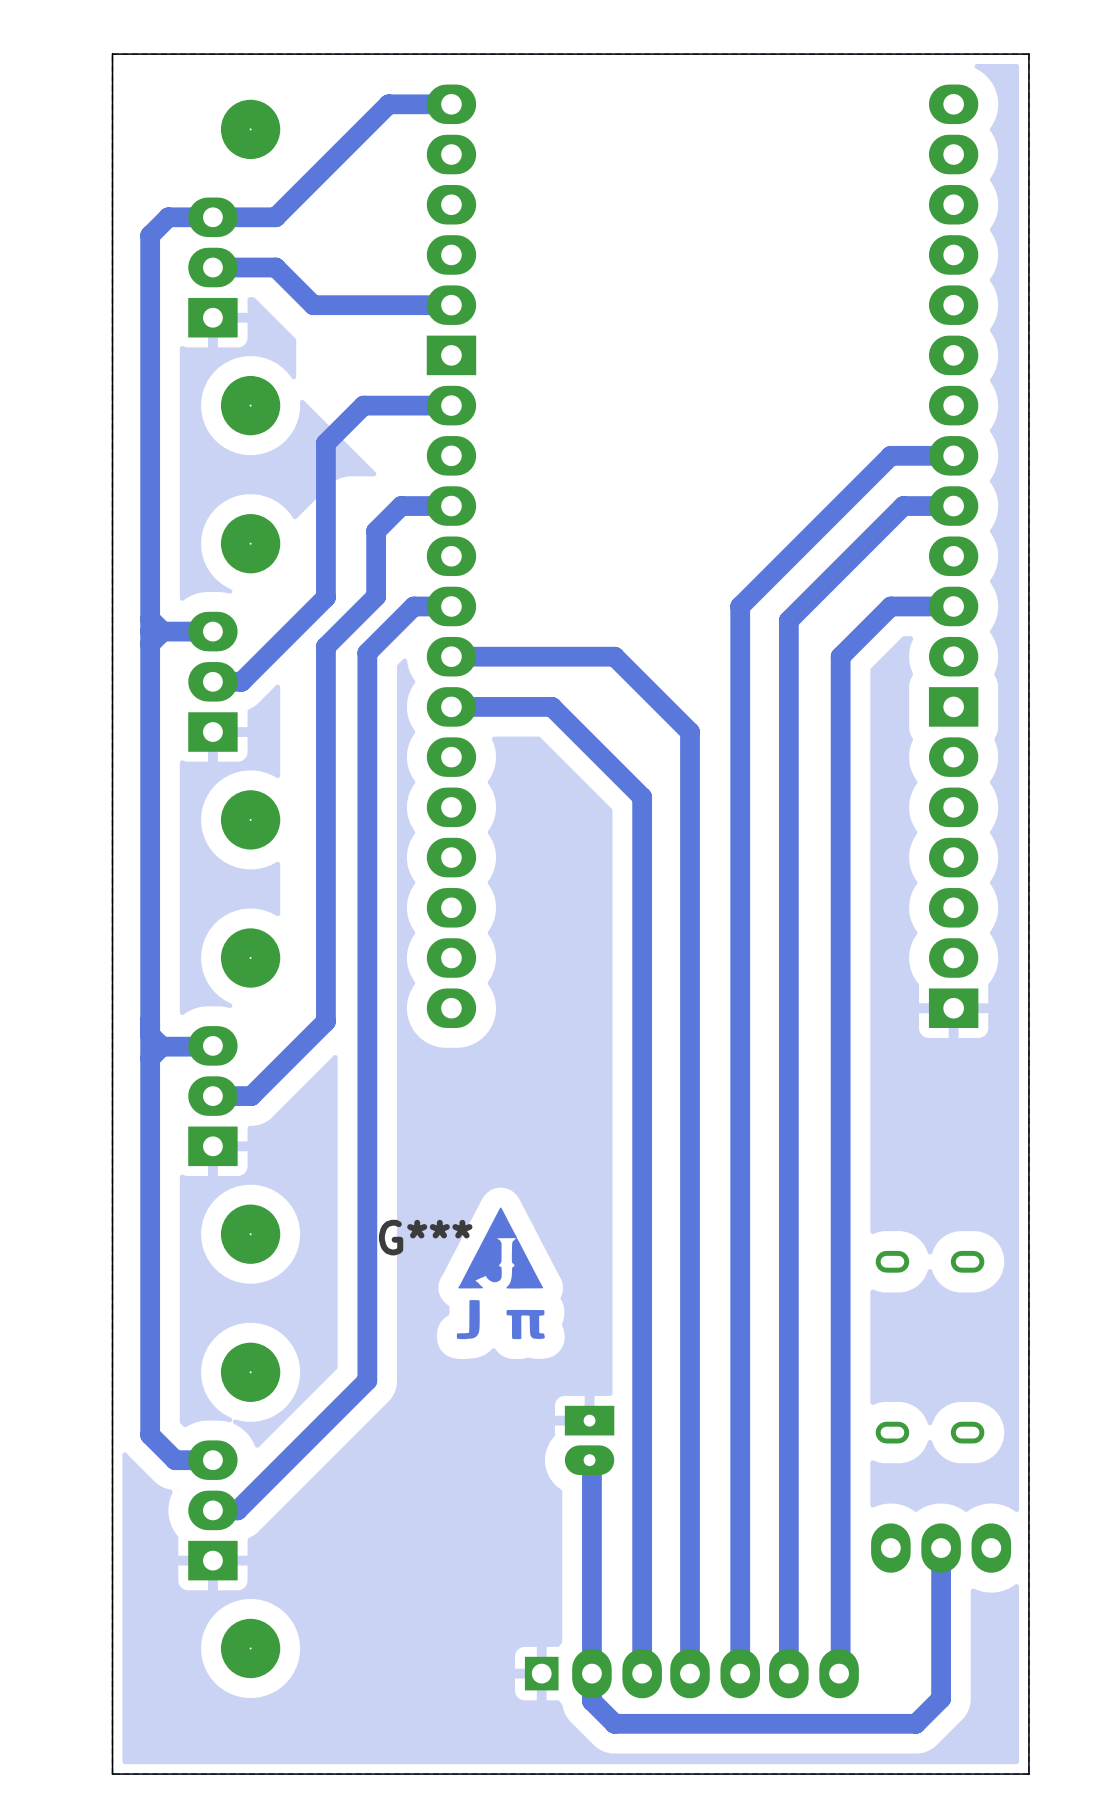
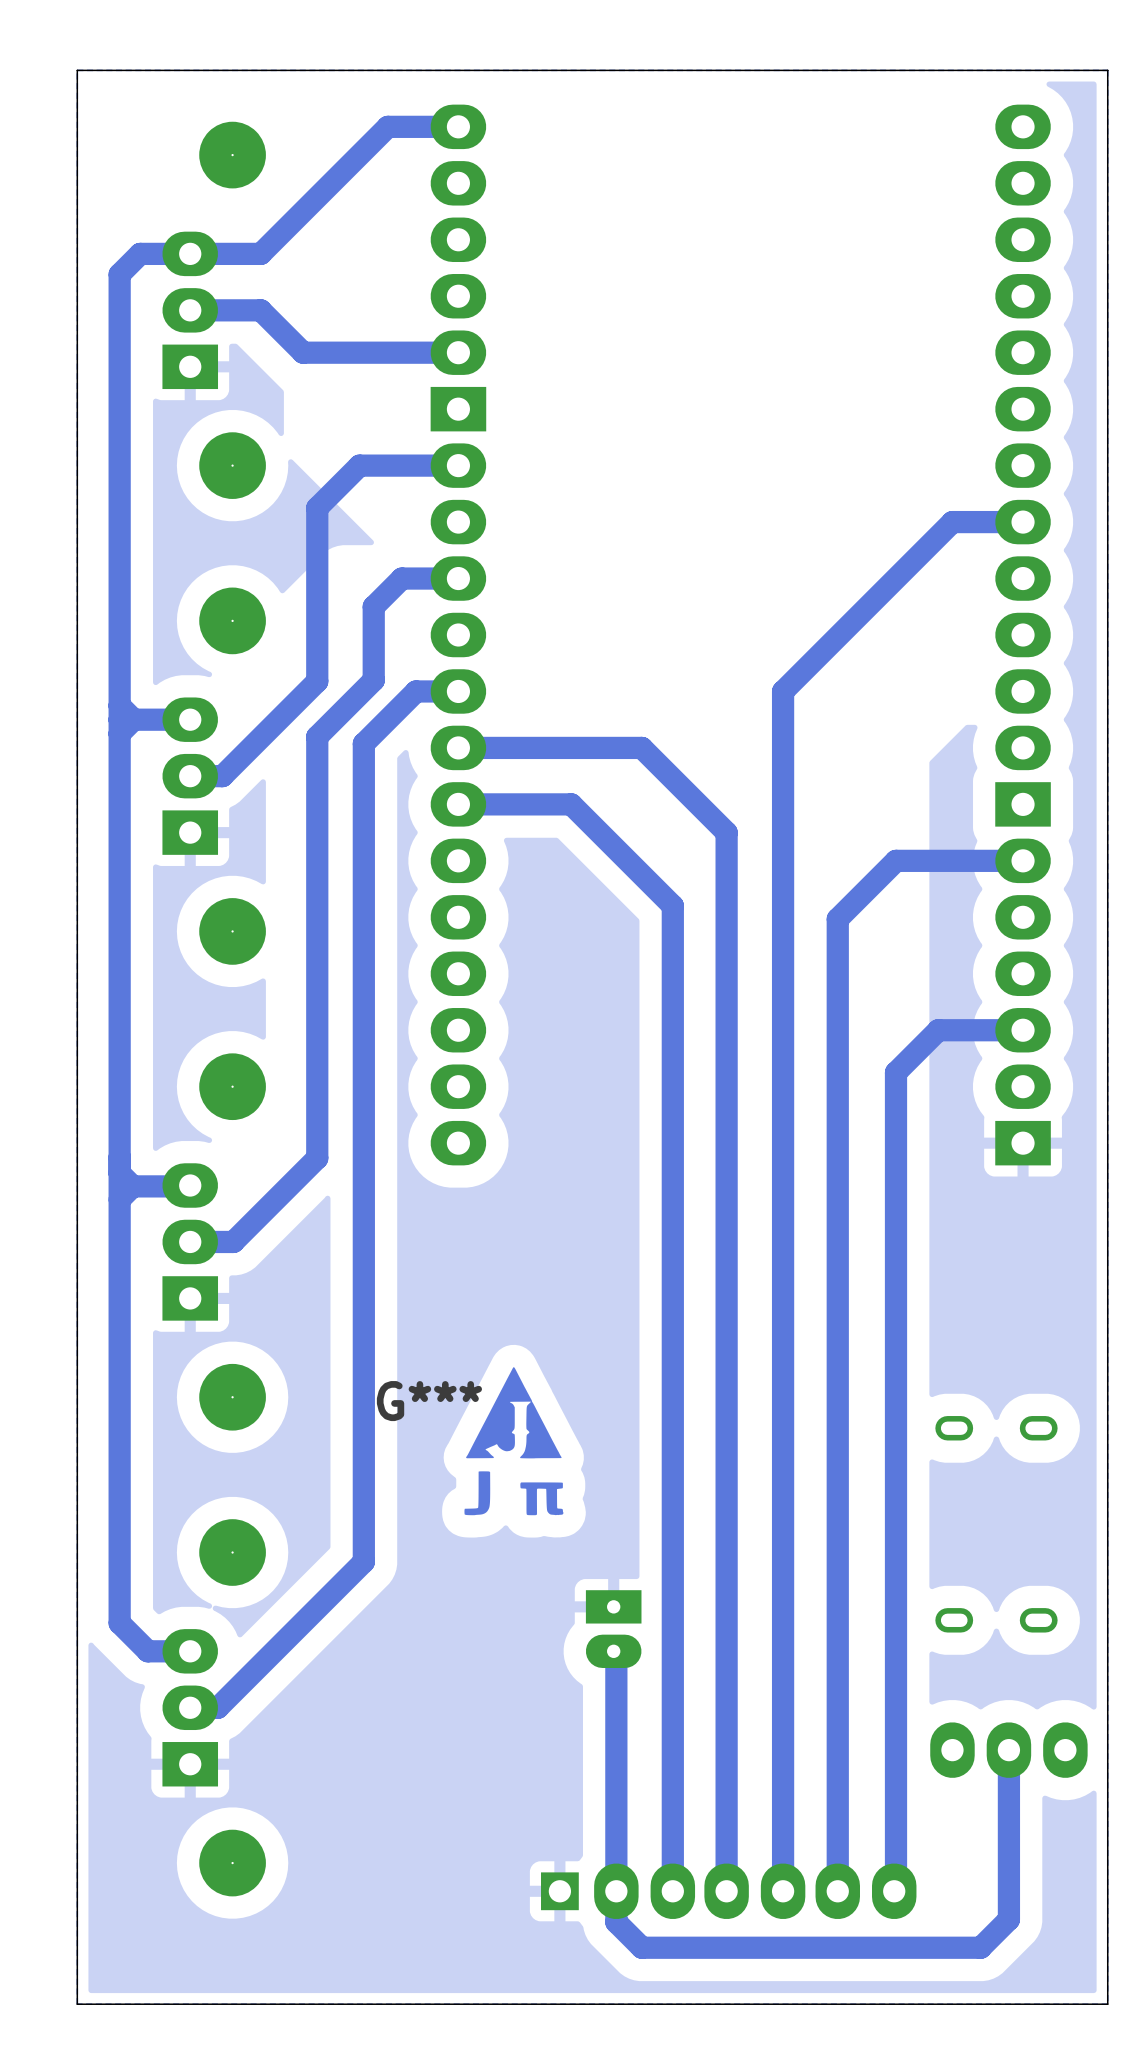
track: (953, 506) (903, 506) (788, 620) (788, 808) -> (1023, 860) (896, 860) (837, 919)
track: (953, 606) (890, 606) (840, 656) (840, 945) -> (1023, 1030) (938, 1030) (896, 1072)

